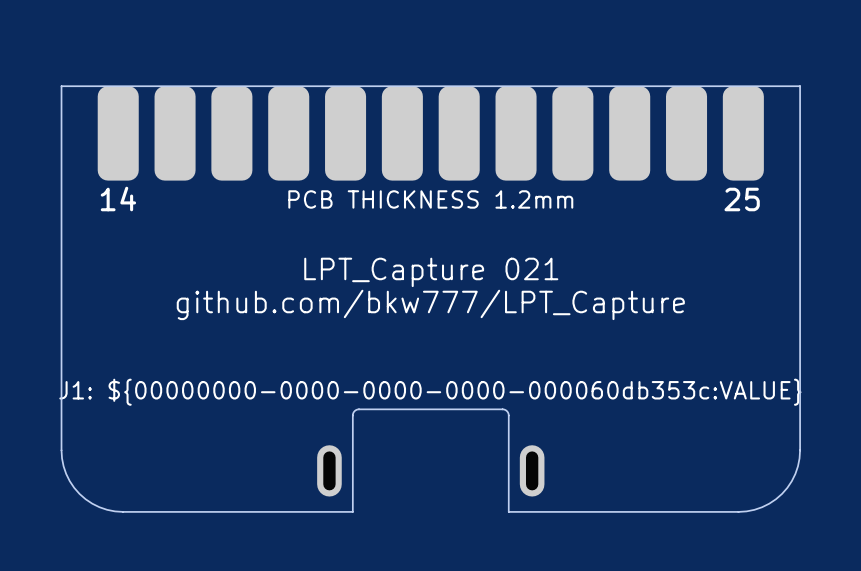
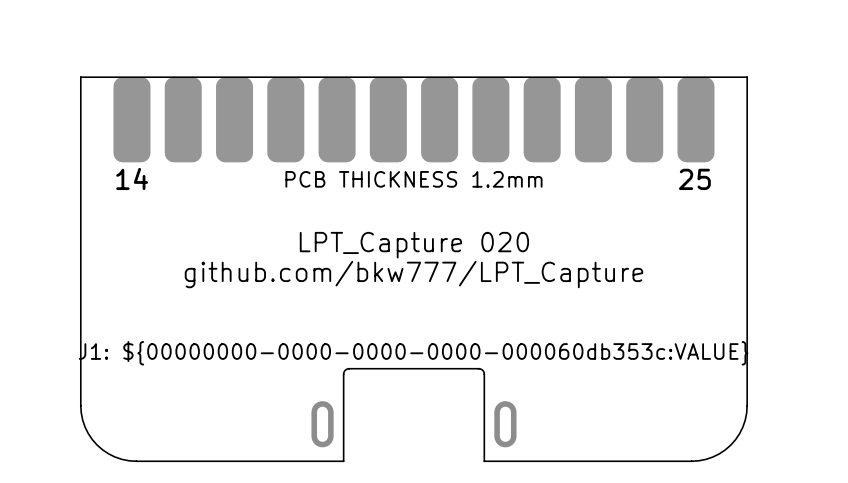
text: LPT_Capture 021 (431, 272) -> LPT_Capture 020 (414, 245)

